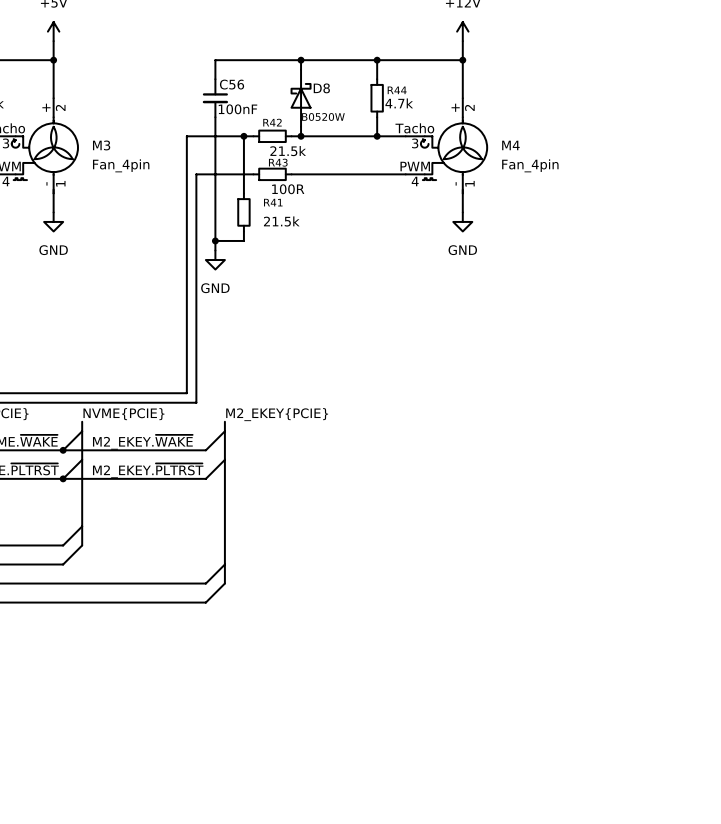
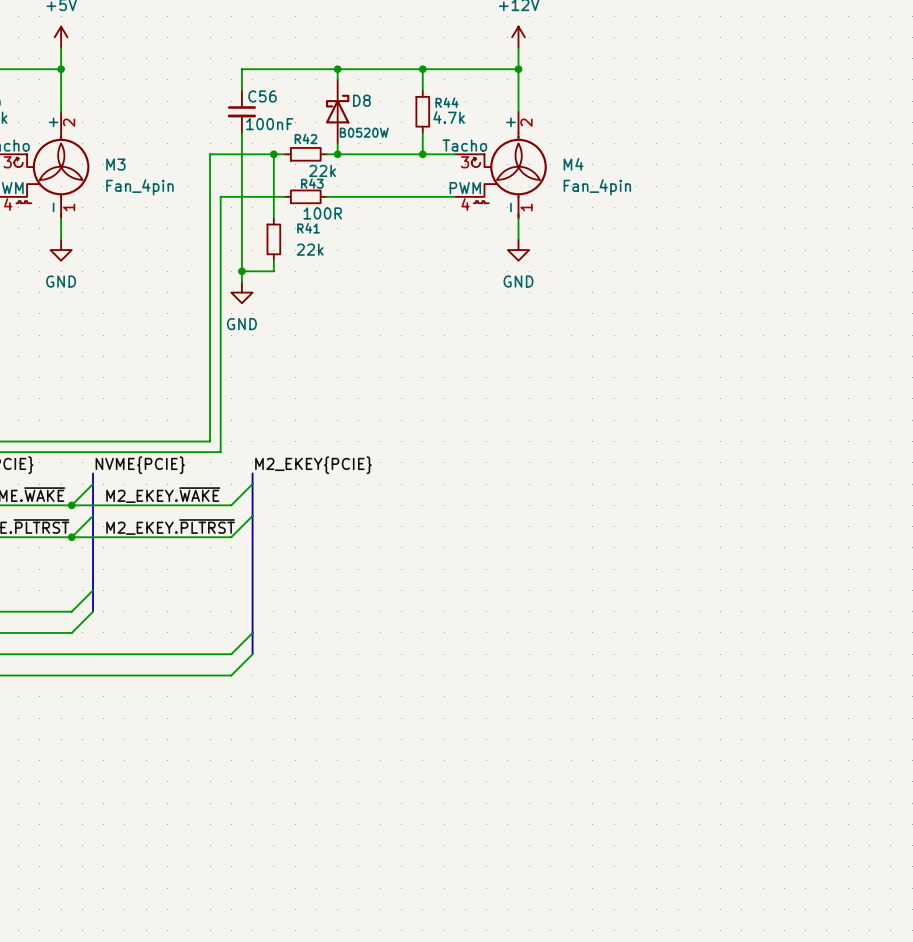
R42 value: 21.5k (288, 151) -> 22k (322, 170)
R41 value: 21.5k (281, 221) -> 22k (310, 249)

